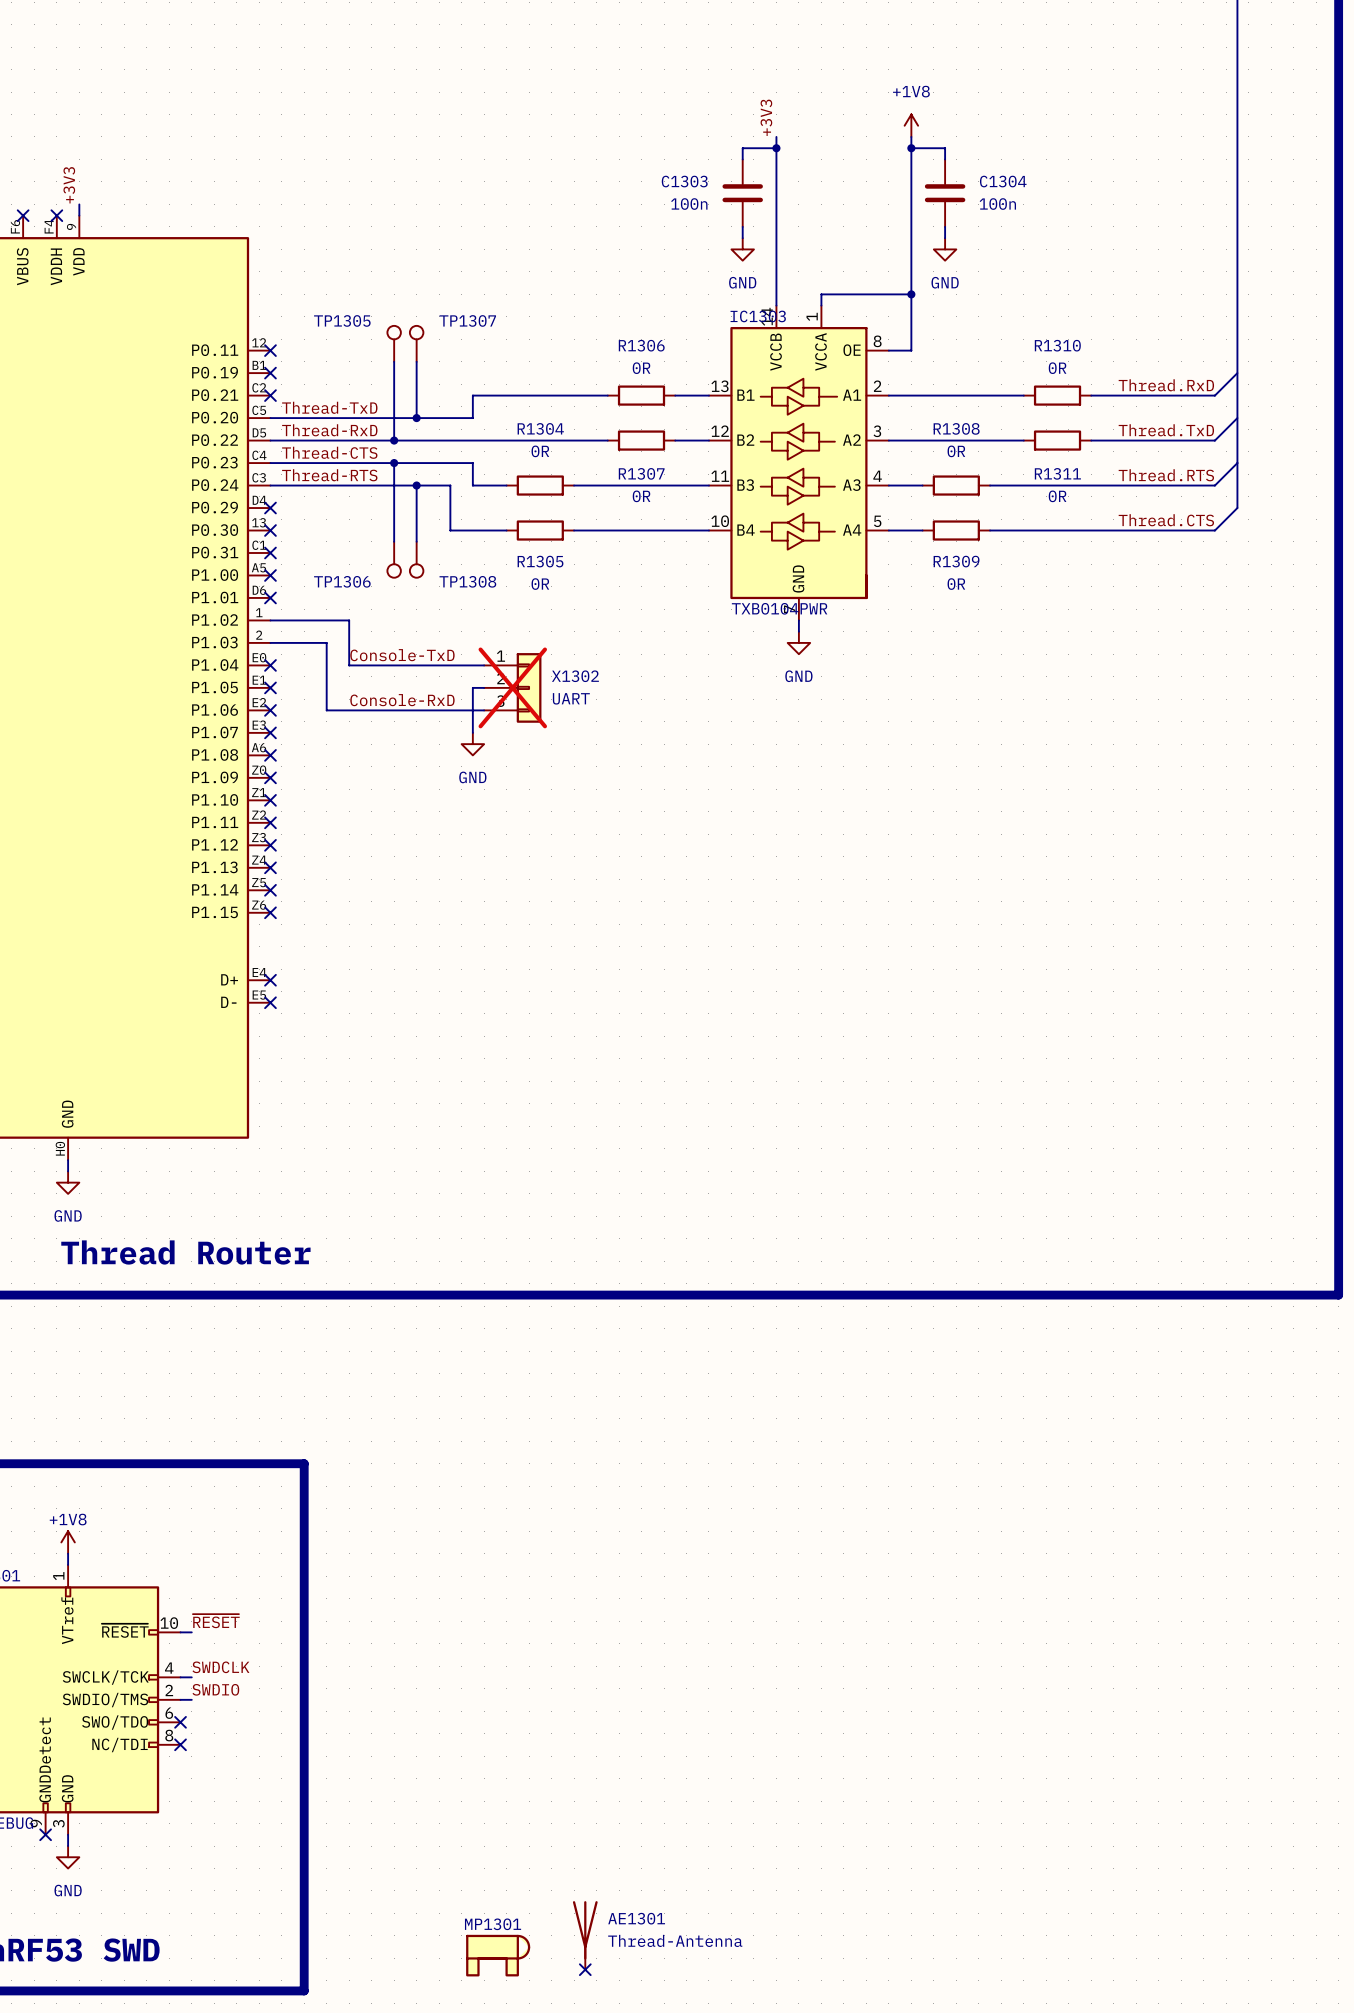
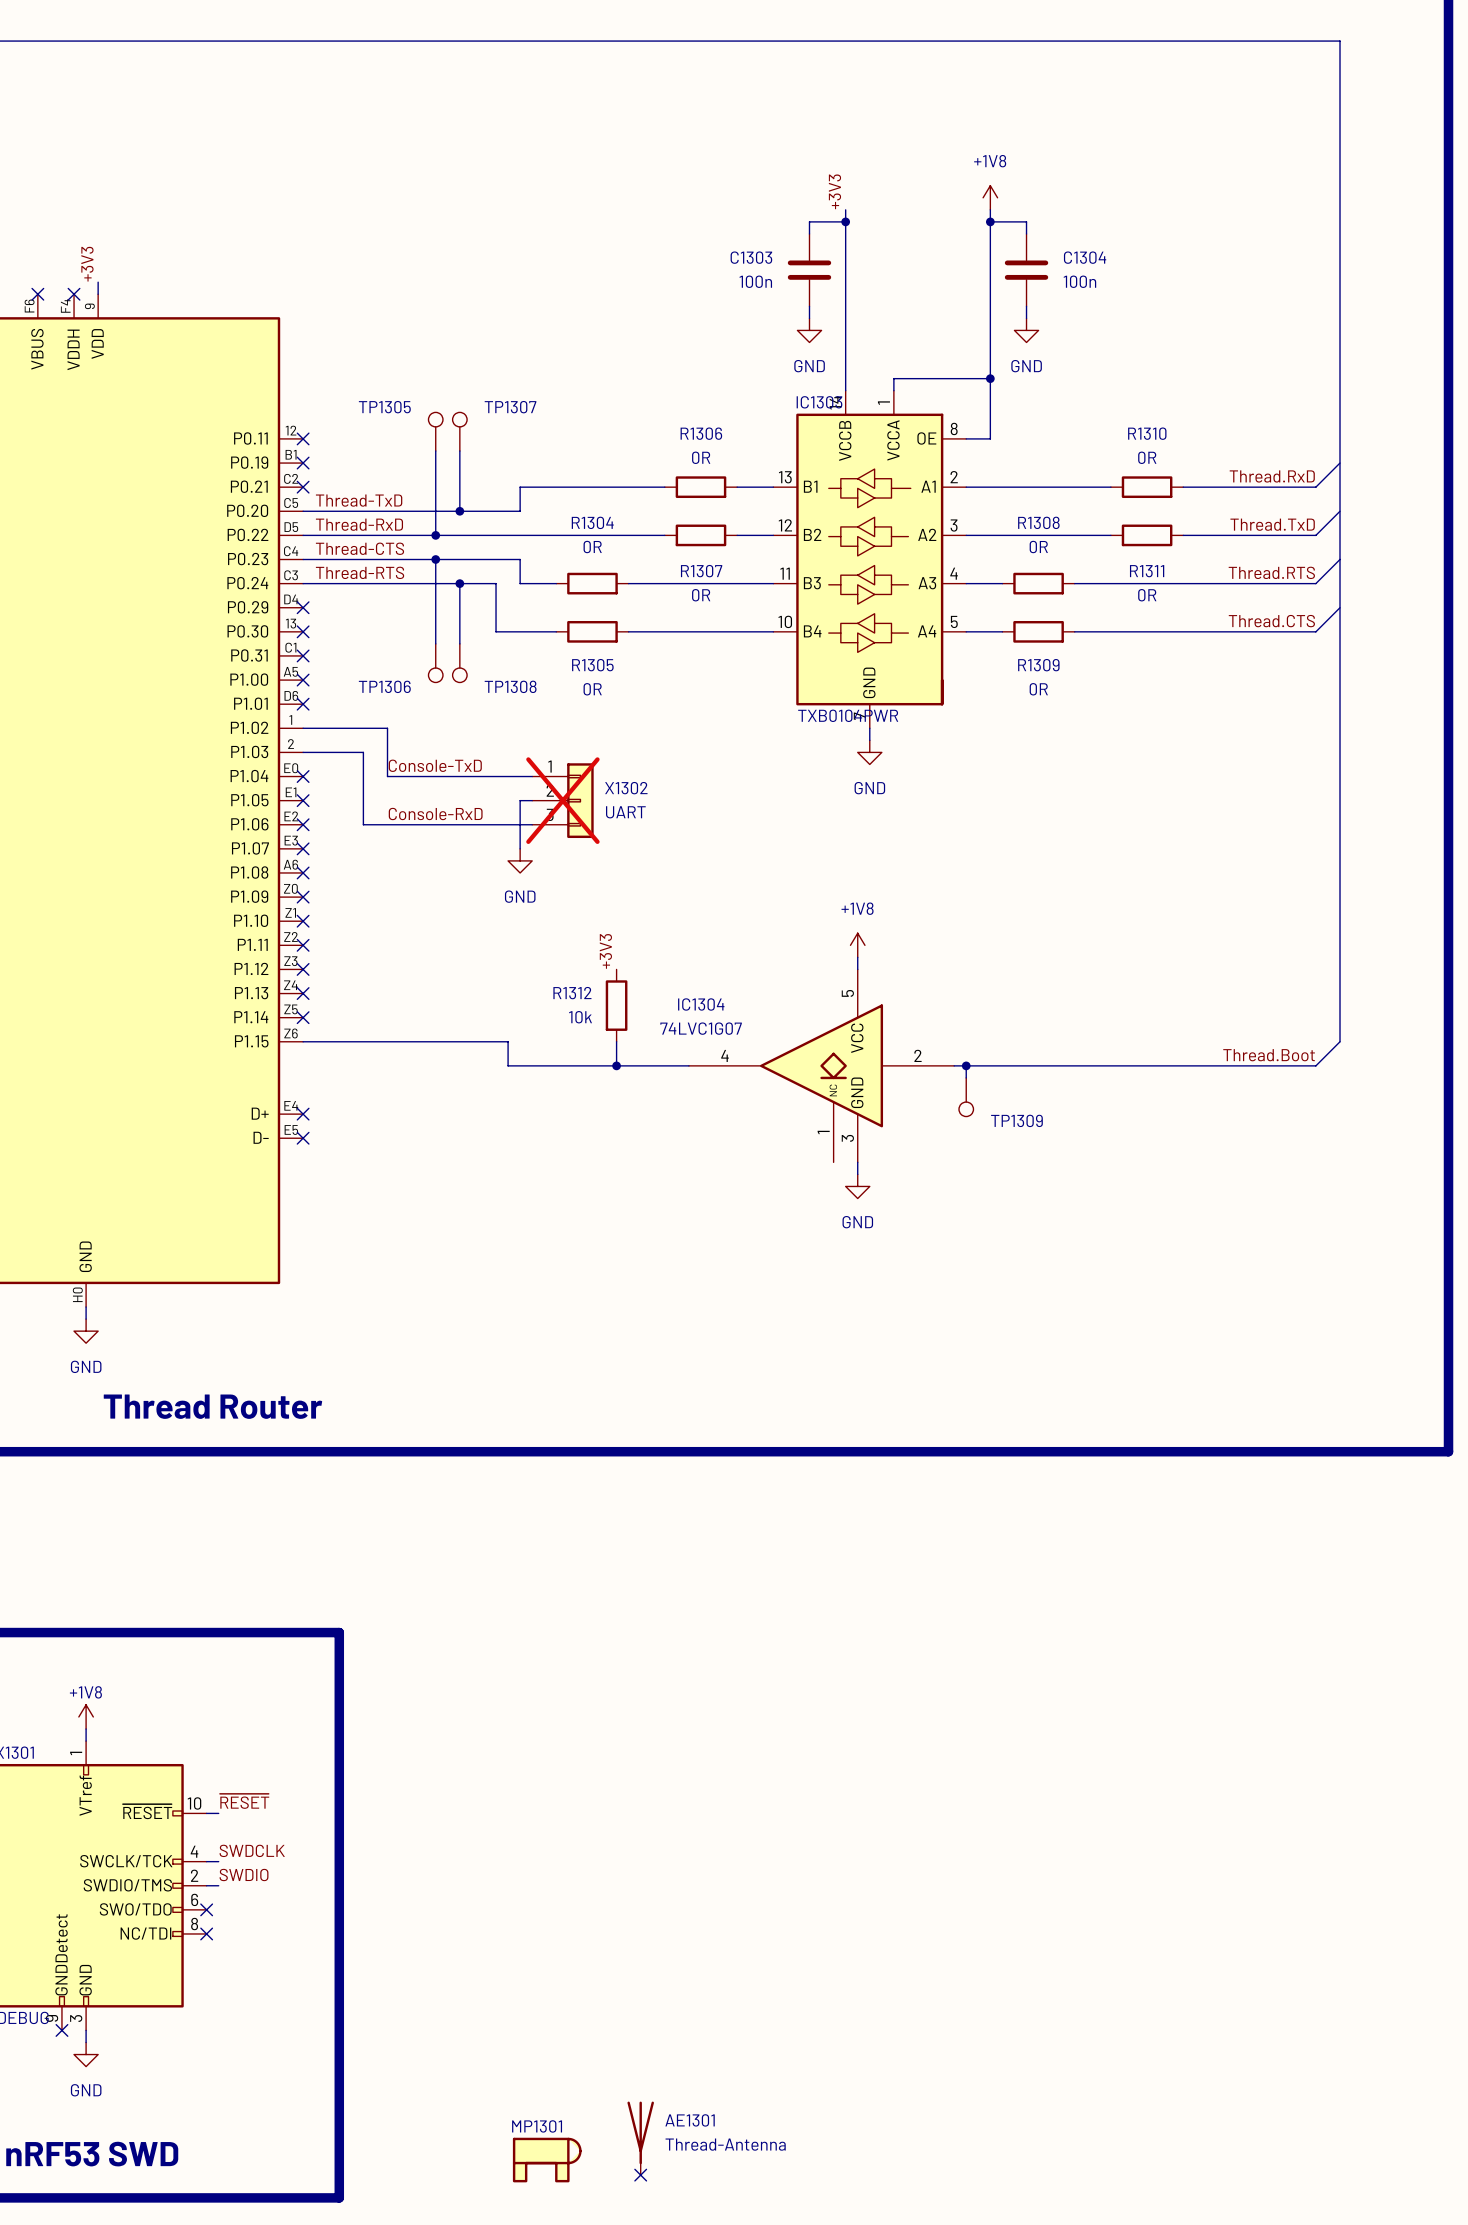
bus: none -> (1340, 607) (1340, 1041)
power symbol: none -> +1V8 (857, 945)
label: none -> +3V3 (605, 951)
wire: none -> (857, 957) (857, 969)
R1312: none -> 10k (616, 1005)
wire: none -> (303, 1041) (508, 1041) (508, 1065) (688, 1065)
no-connect mark: (270, 912) -> none
wire: none -> (616, 1041) (616, 1065)
wire: none -> (1340, 1041) (1315, 1065) (954, 1065)
label: none -> Thread.Boot (1269, 1055)
junction: none -> (616, 1065)
IC1304: none -> 74LVC1G07 (821, 1065)
wire: none -> (966, 1065) (966, 1077)
junction: none -> (966, 1065)
TP1309: none -> (966, 1097)
wire: none -> (857, 1162) (857, 1174)
power symbol: none -> GND (857, 1186)

